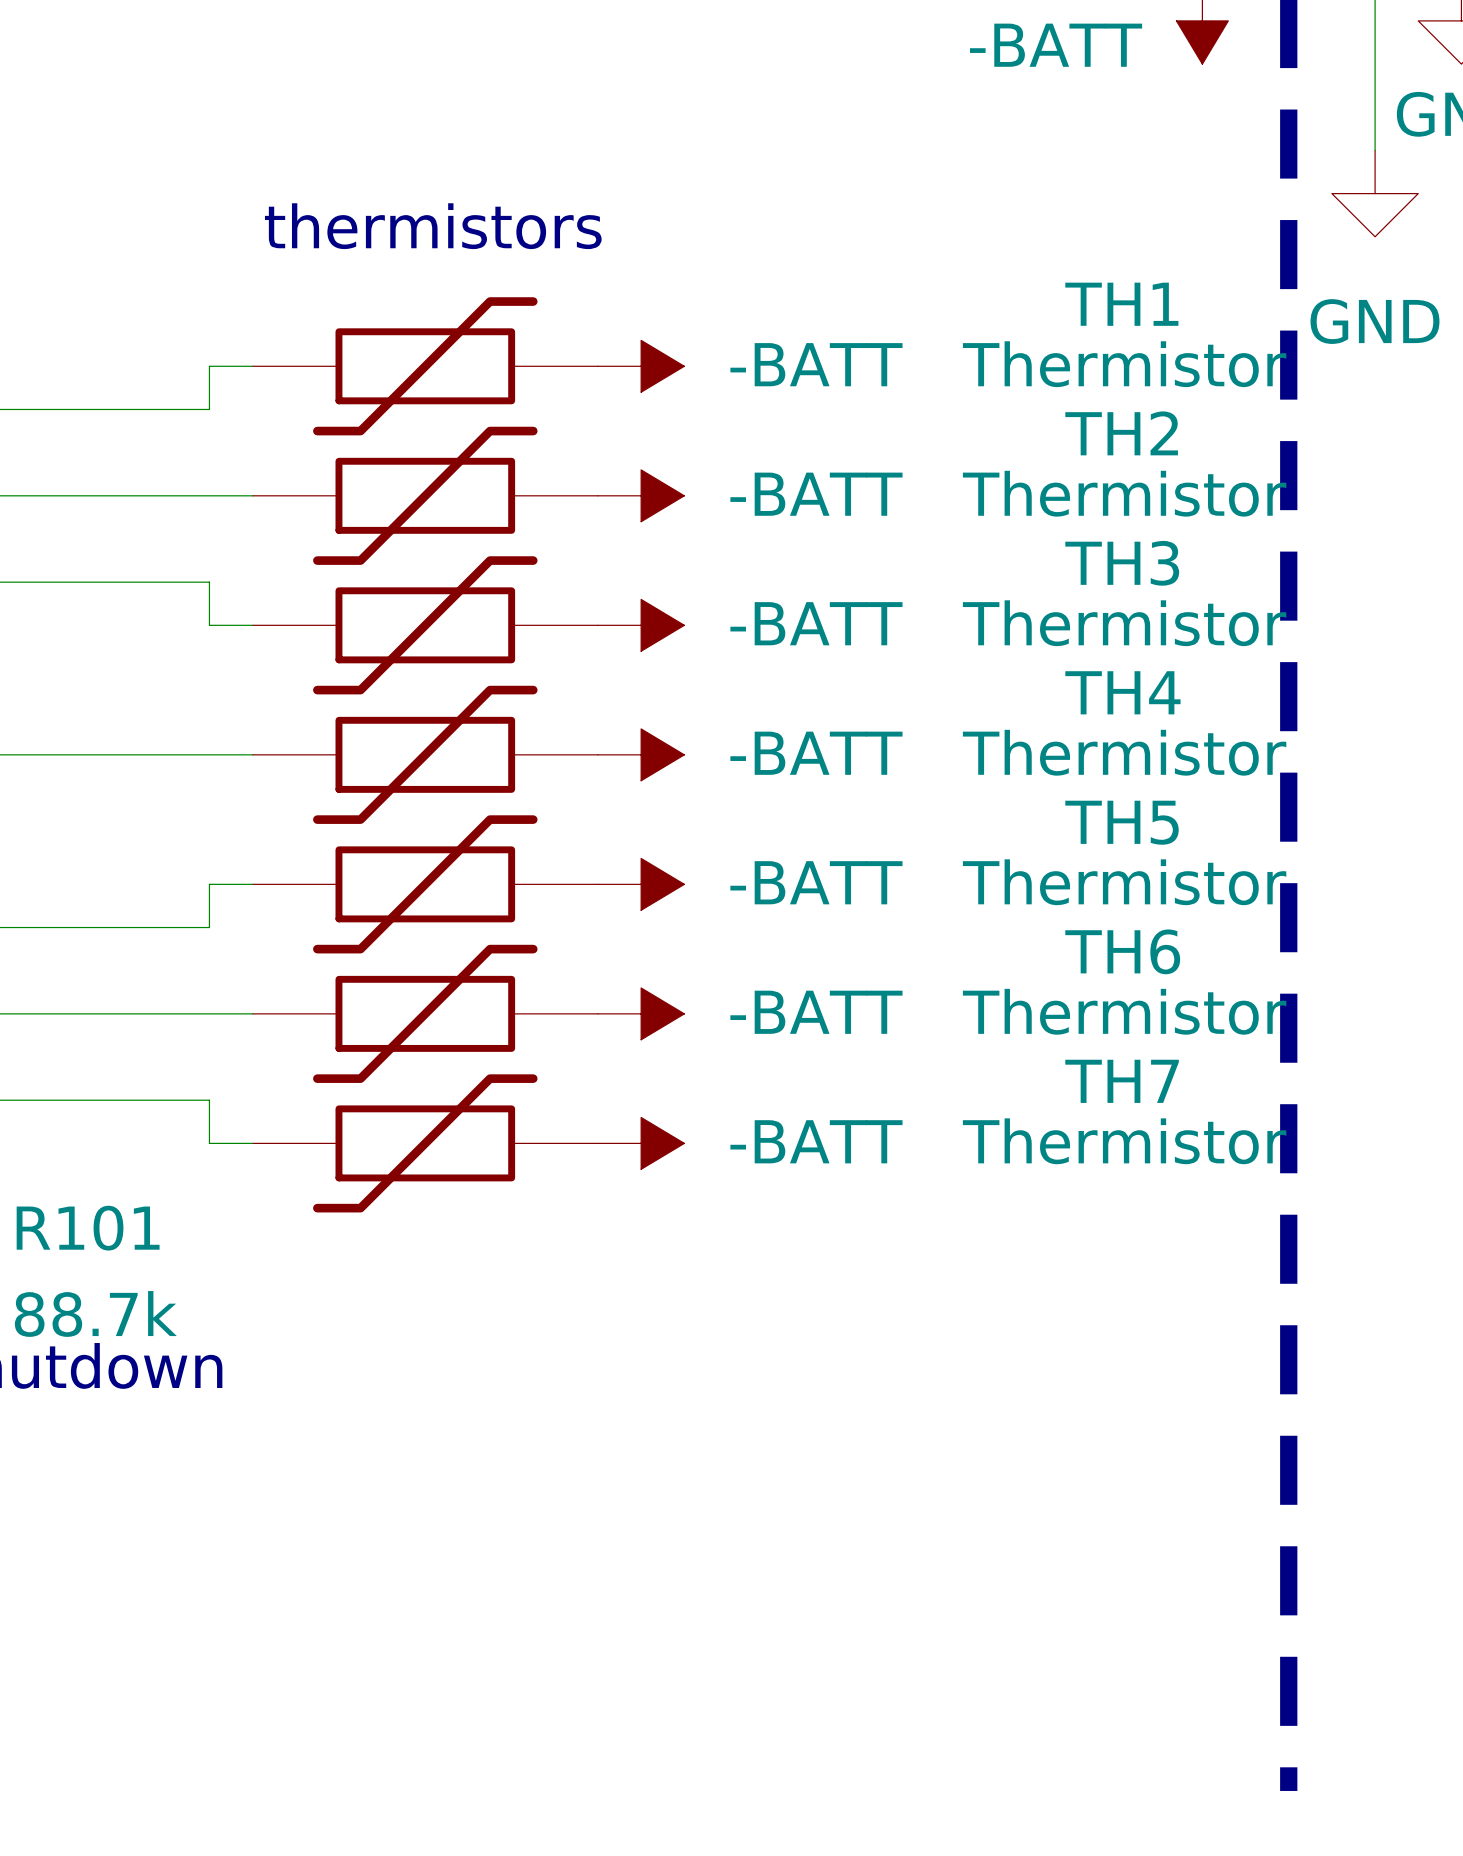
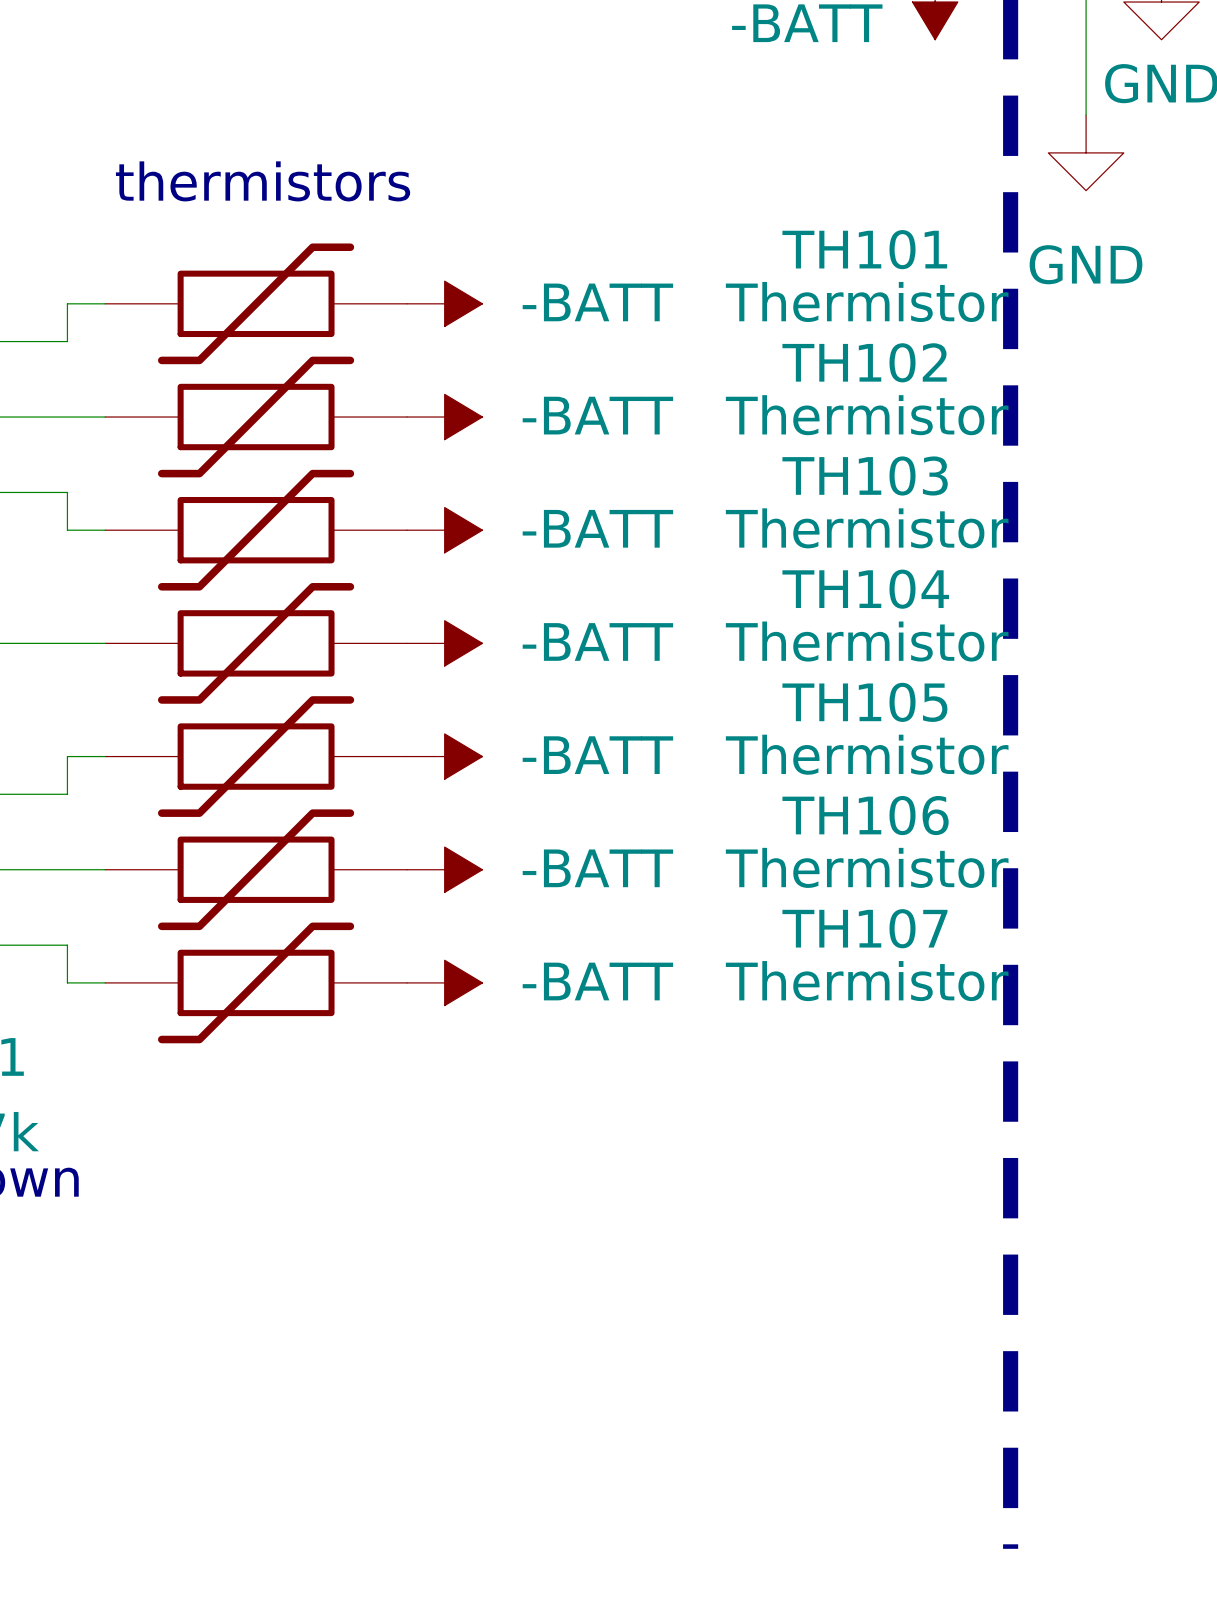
TH1 name: TH1 (1121, 304) -> TH101 (864, 249)
TH2 name: TH2 (1121, 433) -> TH102 (864, 362)
TH3 name: TH3 (1122, 563) -> TH103 (865, 475)
TH4 name: TH4 (1122, 692) -> TH104 (865, 589)
TH5 name: TH5 (1122, 822) -> TH105 (864, 702)
TH6 name: TH6 (1122, 951) -> TH106 (865, 815)
TH7 name: TH7 (1122, 1081) -> TH107 (864, 928)

